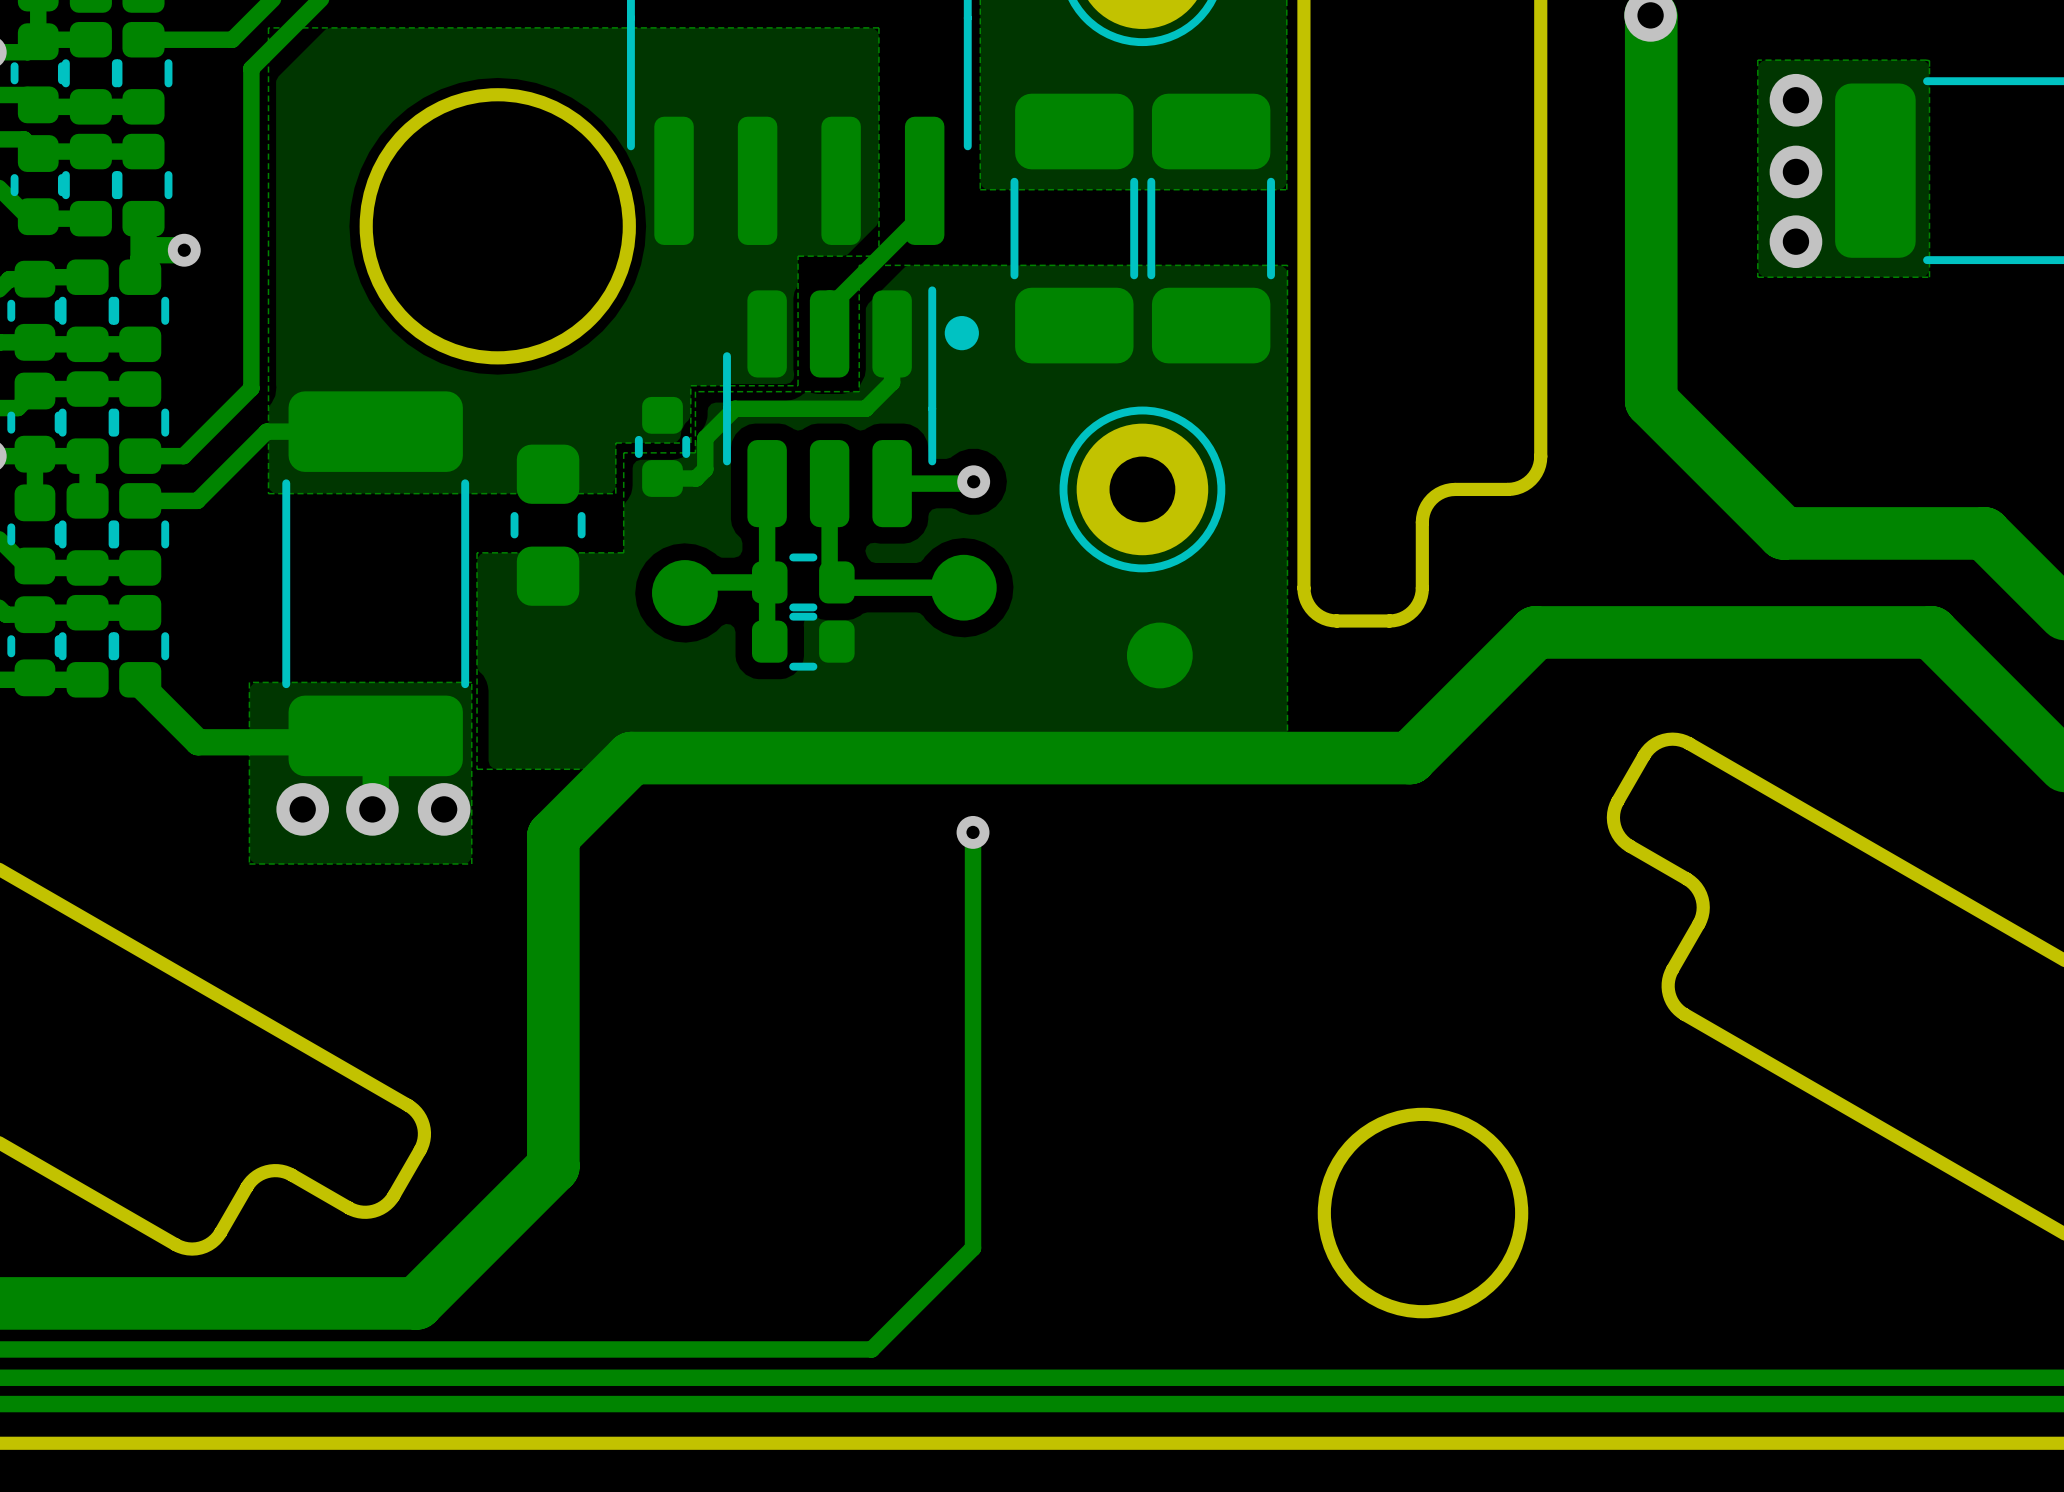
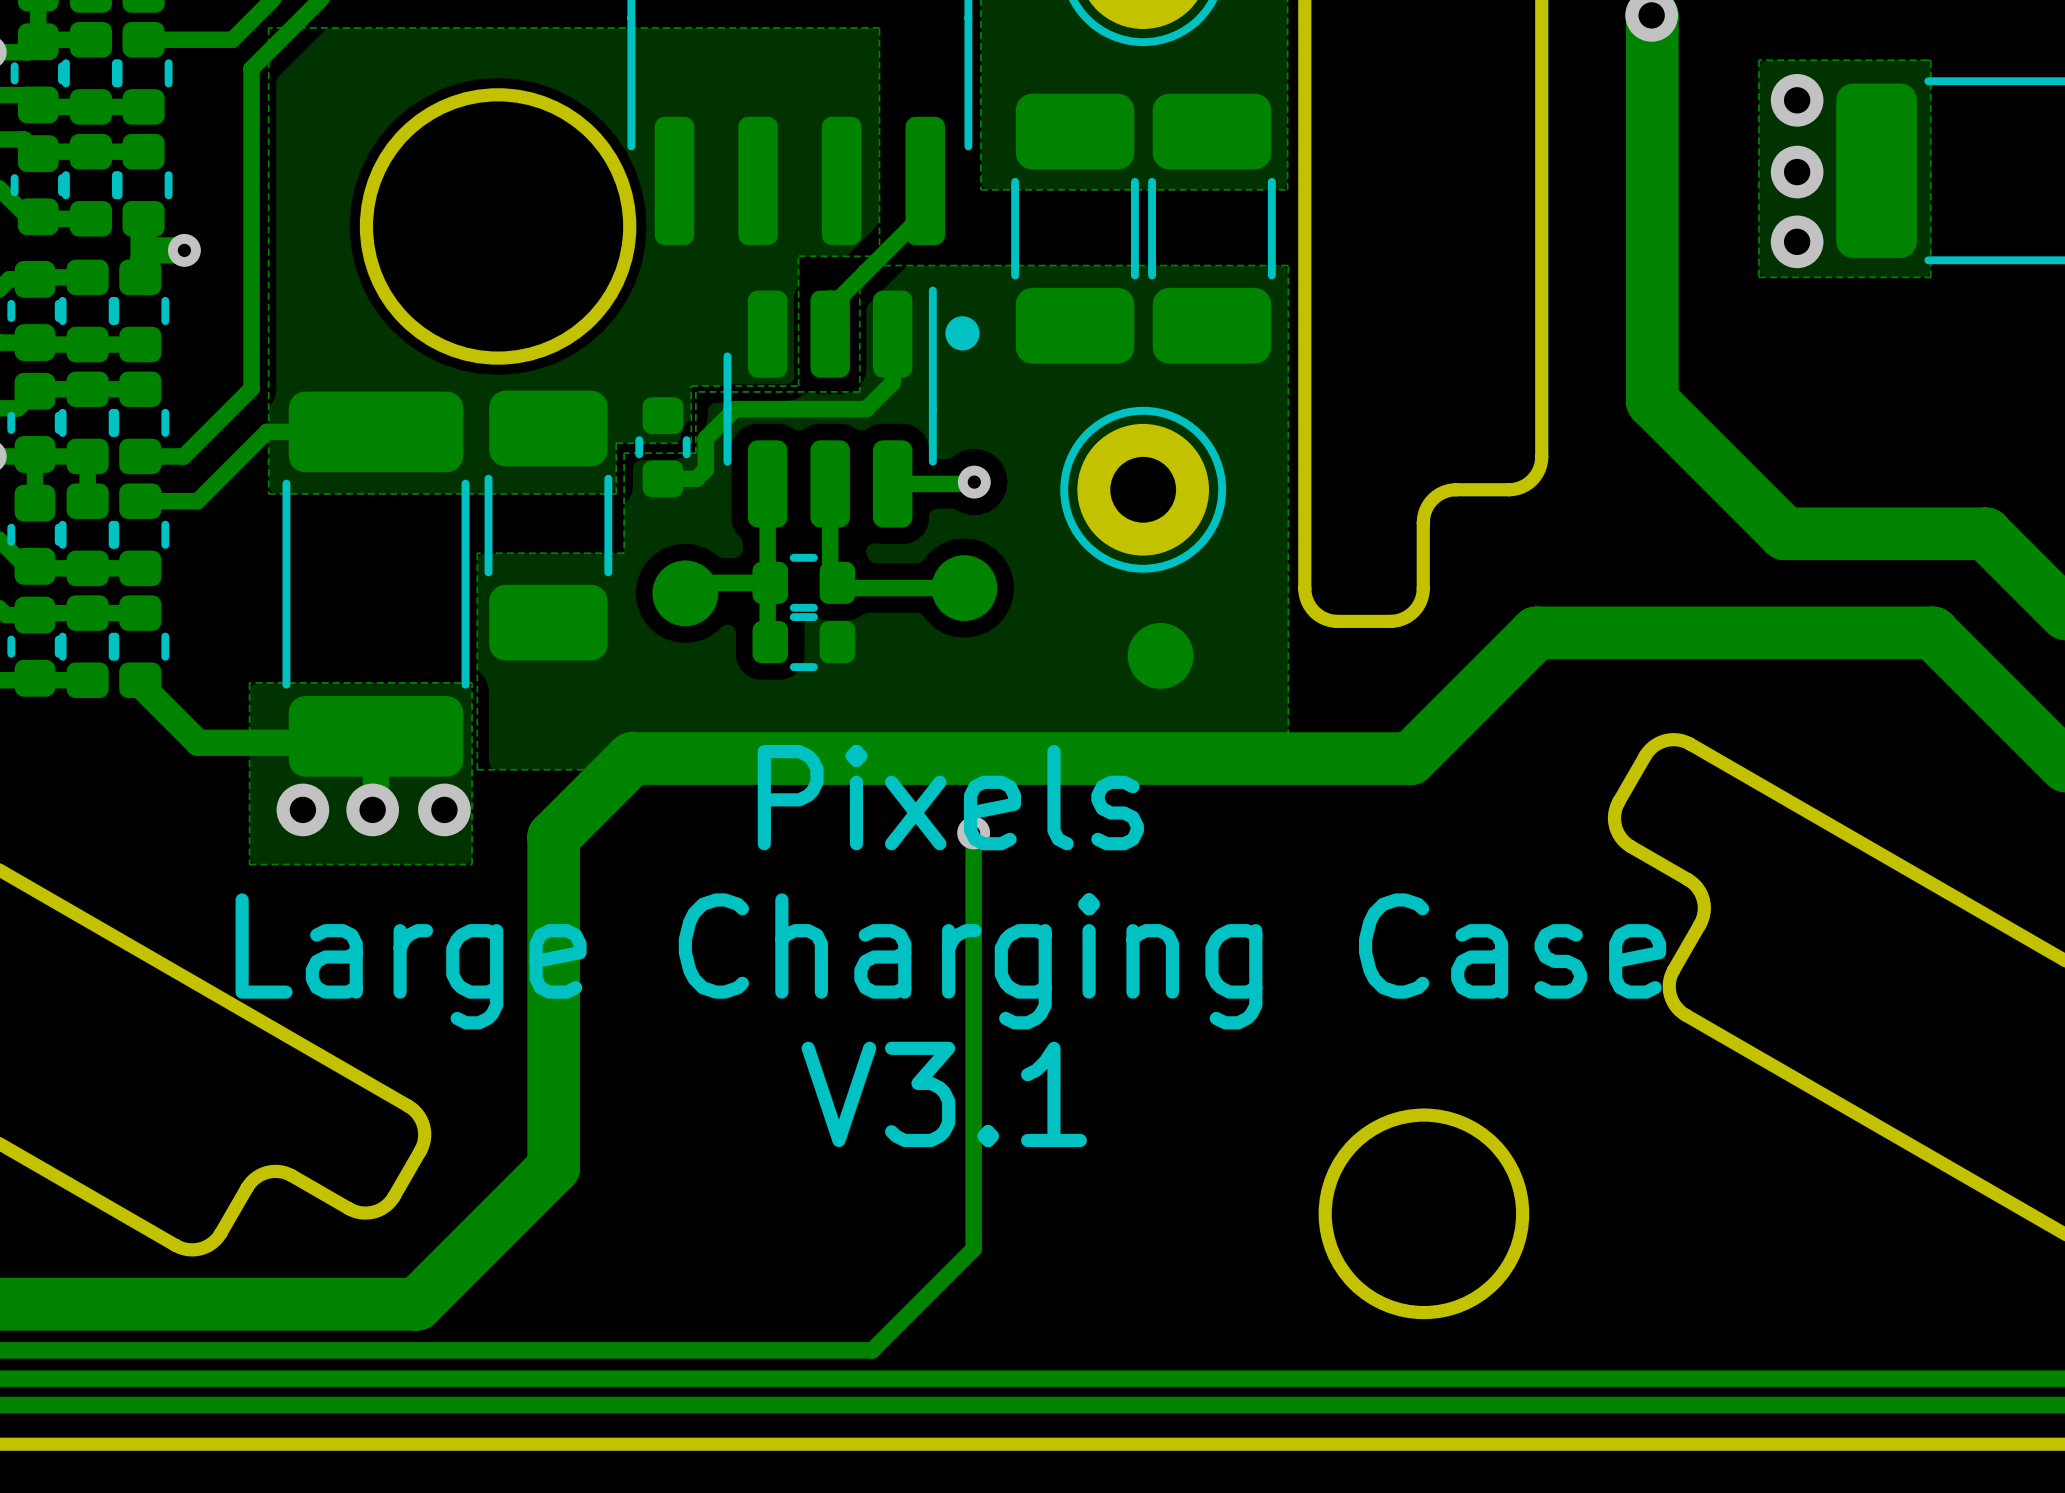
part footprint: [510, 444, 586, 606] -> [484, 390, 613, 661]
text: none -> Pixels (950, 797)
text: none -> Large Charging Case (950, 961)
text: none -> V3.1 (944, 1094)

